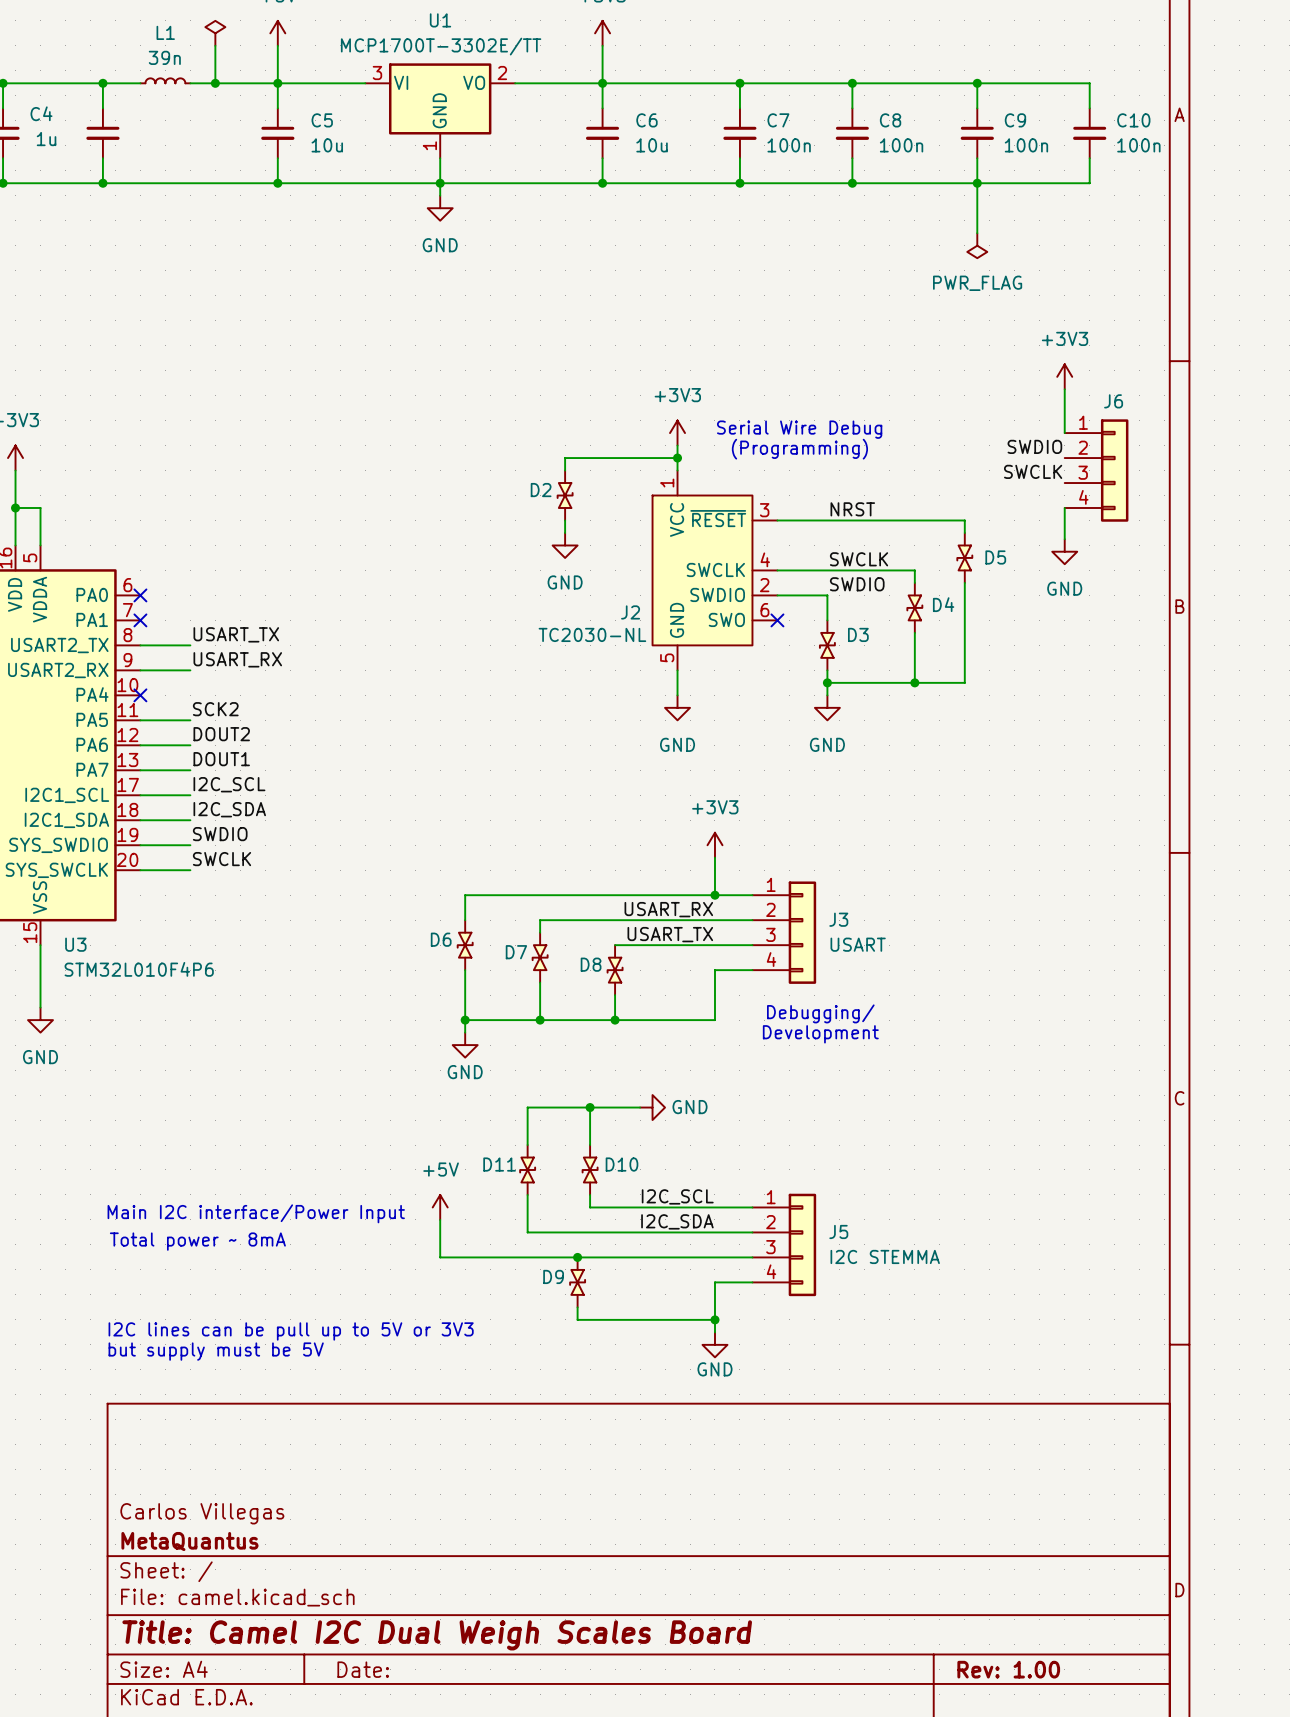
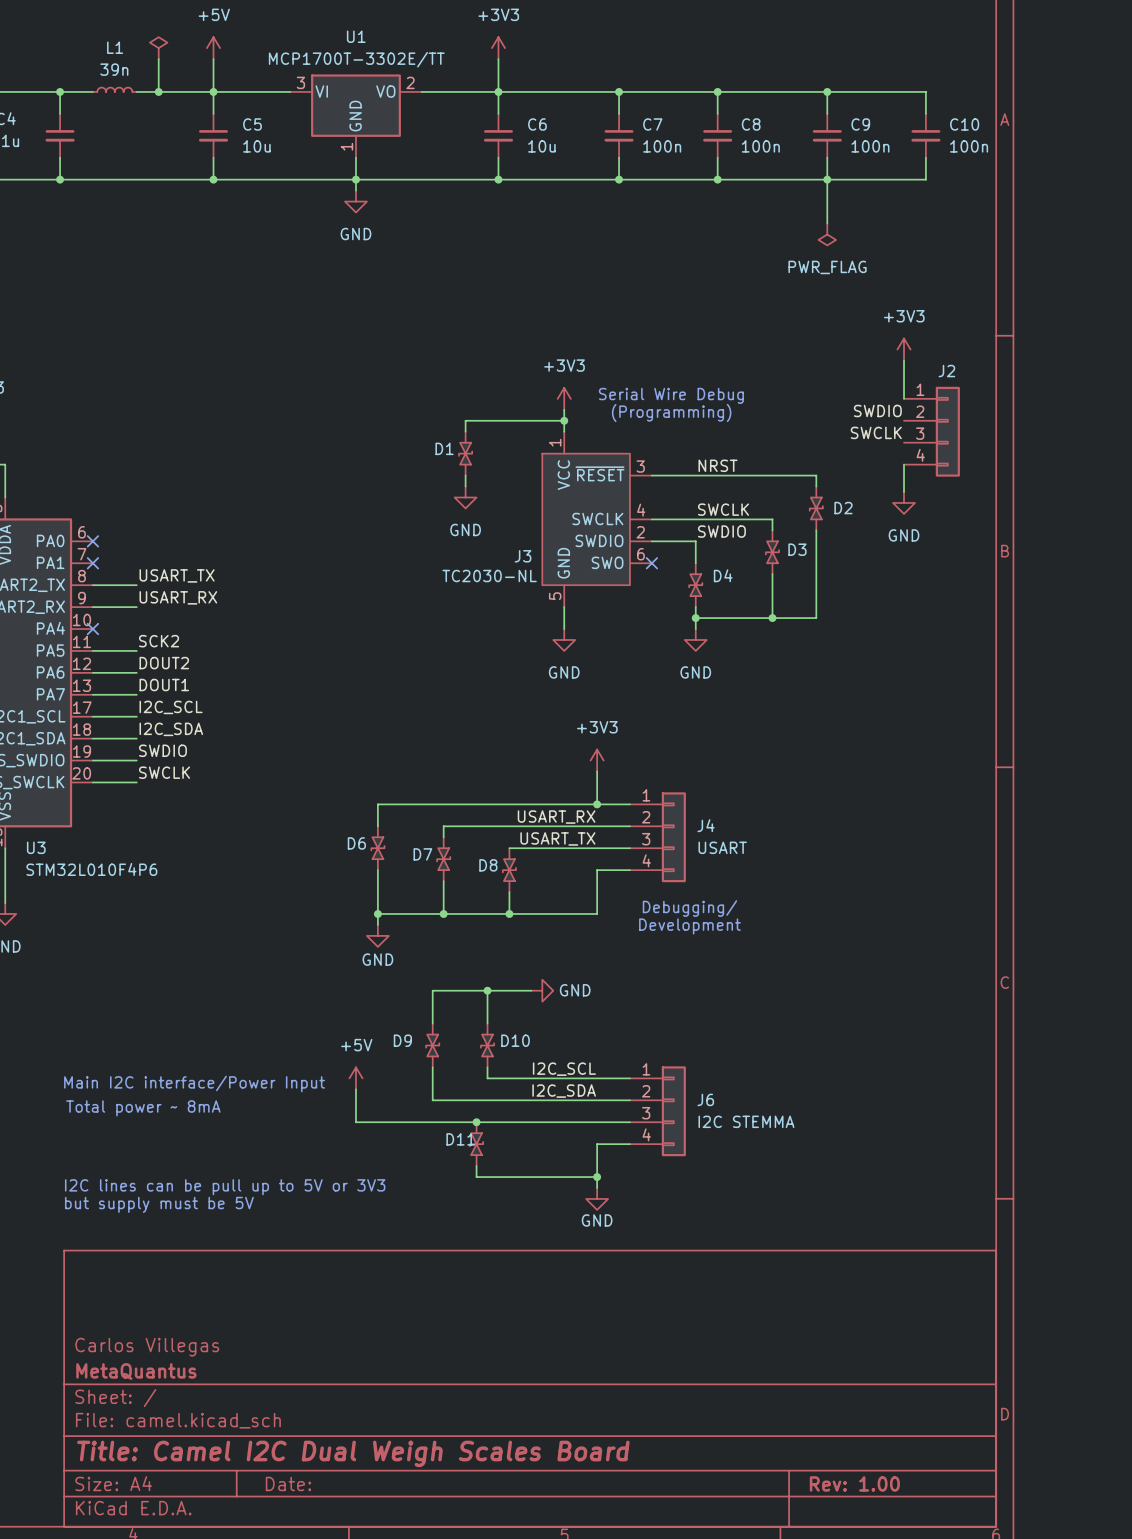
J6 name: J6 (1113, 401) -> J2 (946, 371)
D2 name: D2 (541, 490) -> D1 (444, 448)
D5 name: D5 (995, 557) -> D2 (843, 508)
D4 name: D4 (943, 604) -> D3 (797, 549)
J2 name: J2 (630, 612) -> J3 (523, 556)
D3 name: D3 (858, 634) -> D4 (723, 575)
J3 name: J3 (838, 919) -> J4 (706, 825)
D11 name: D11 (499, 1164) -> D9 (402, 1040)
J5 name: J5 (838, 1231) -> J6 (705, 1099)
D9 name: D9 (553, 1276) -> D11 (460, 1139)

